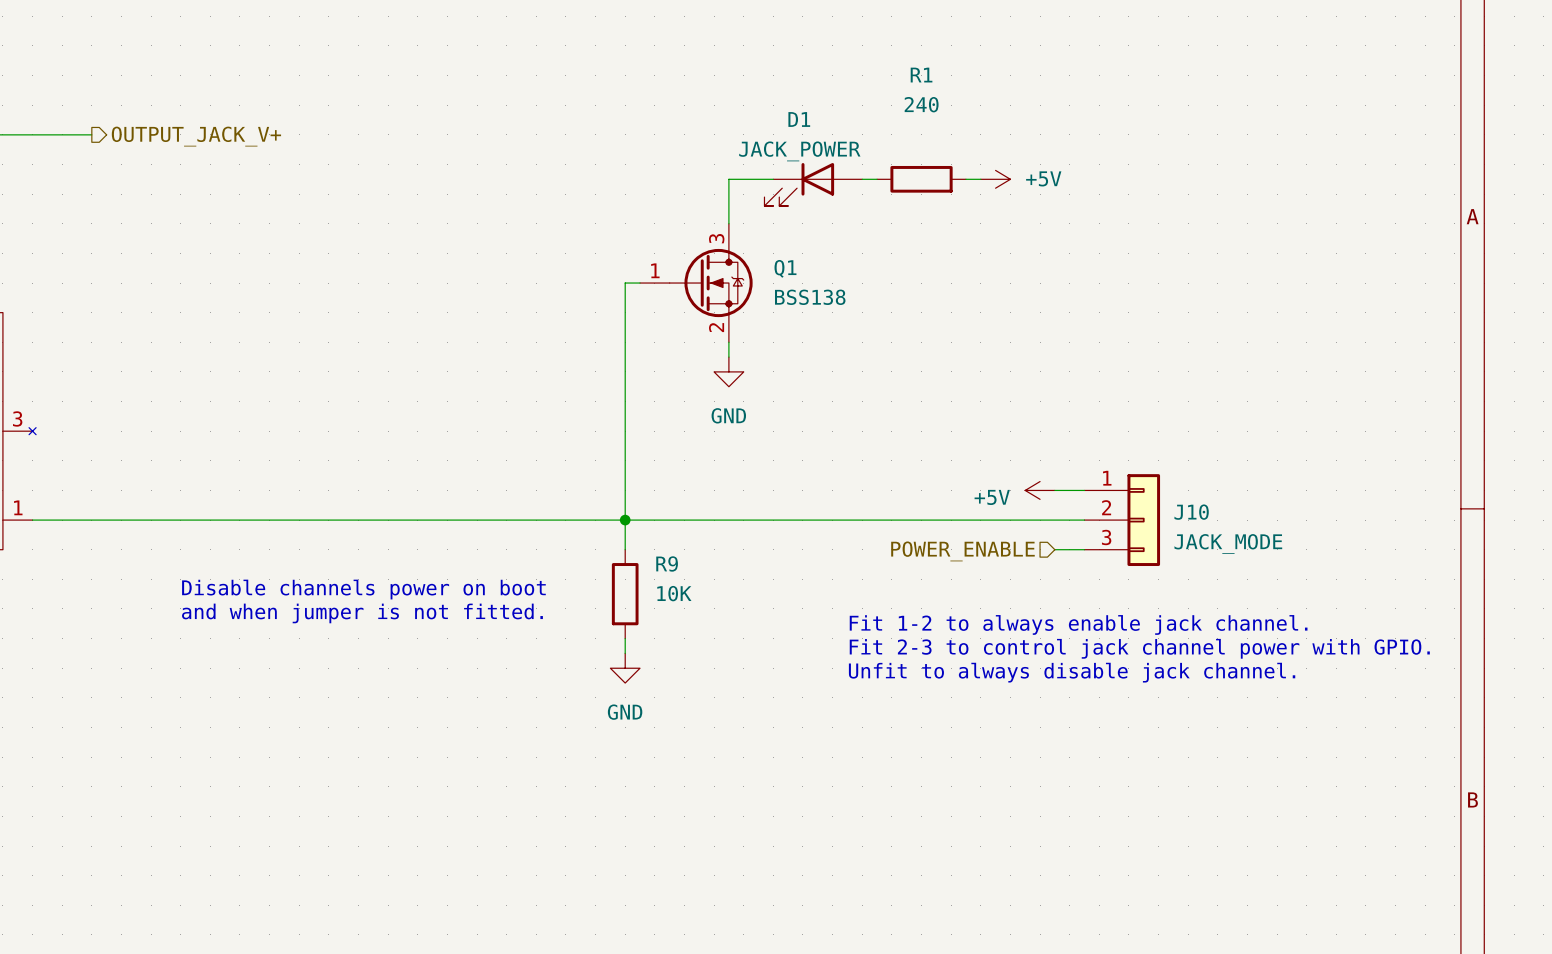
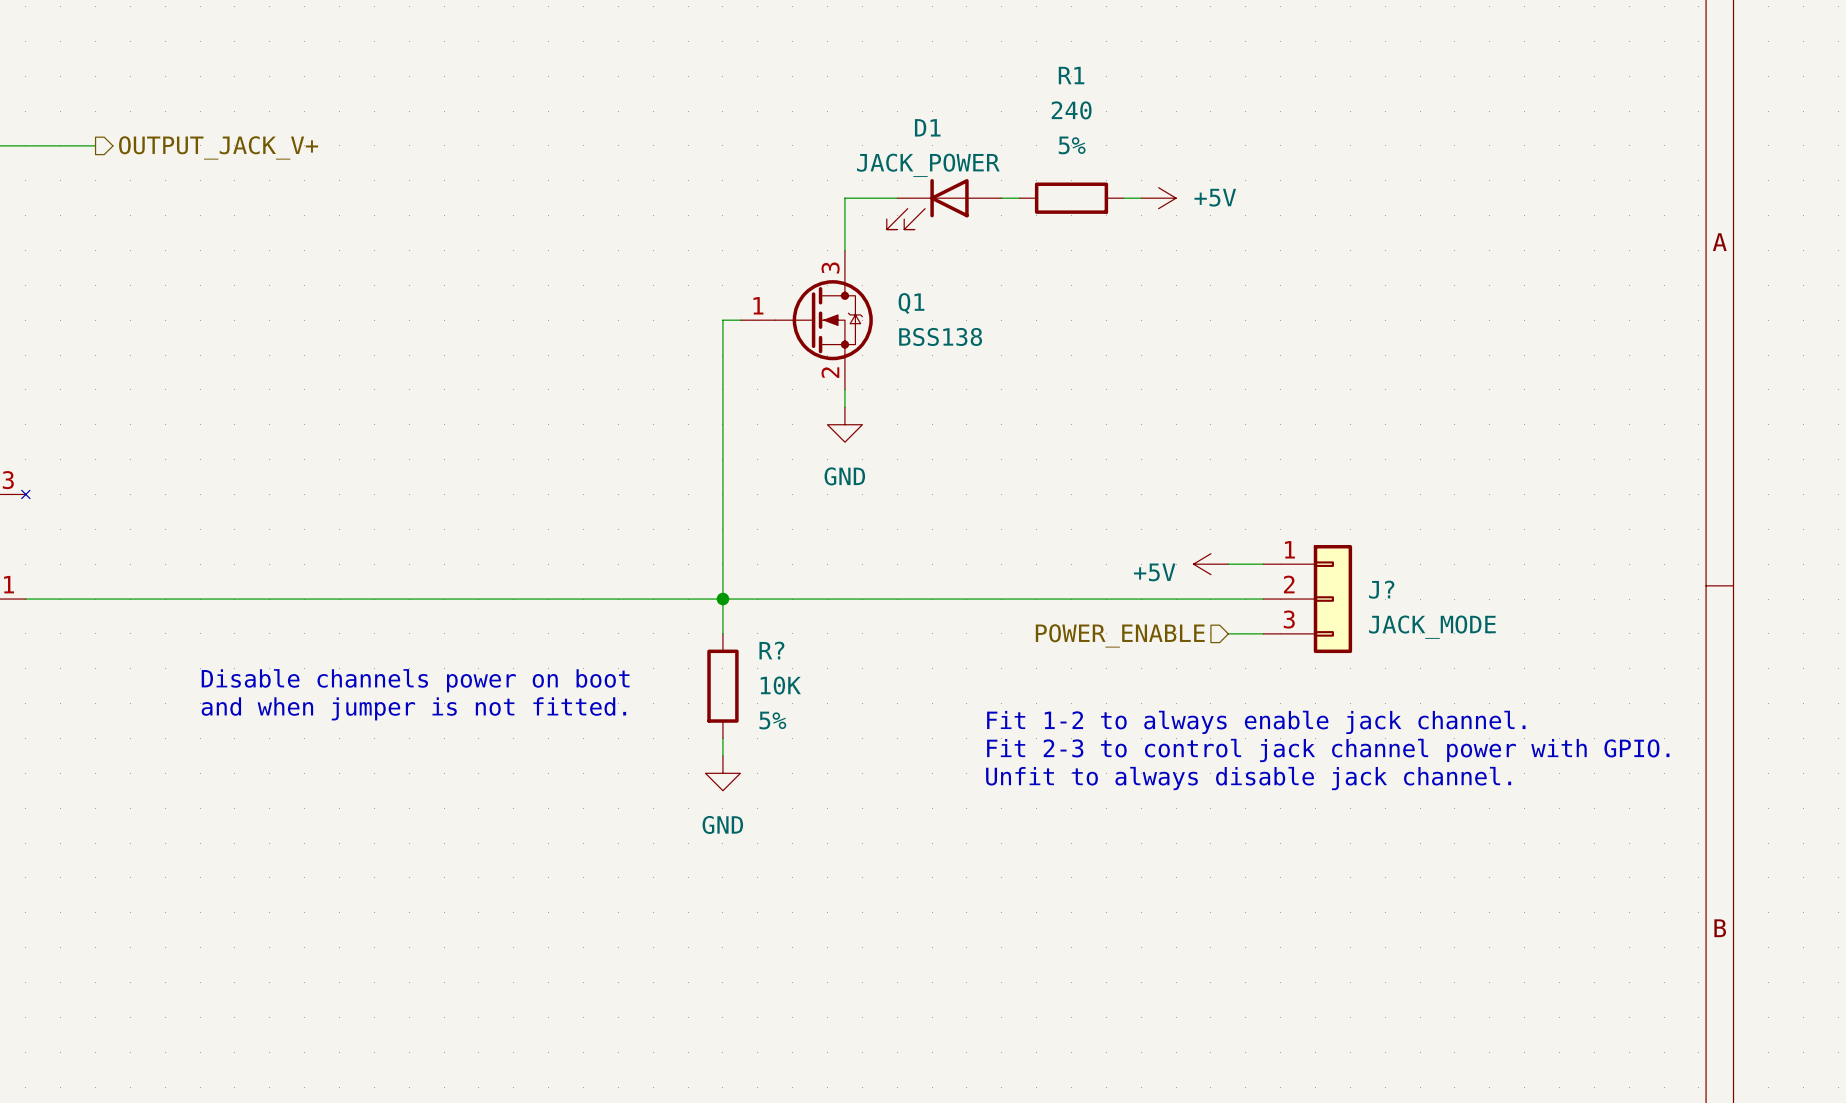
R1 text: none -> 5% (1072, 145)
J10 name: J10 (1191, 512) -> J? (1381, 589)
R9 name: R9 (667, 563) -> R? (771, 650)
R9 text: none -> 5% (772, 720)

